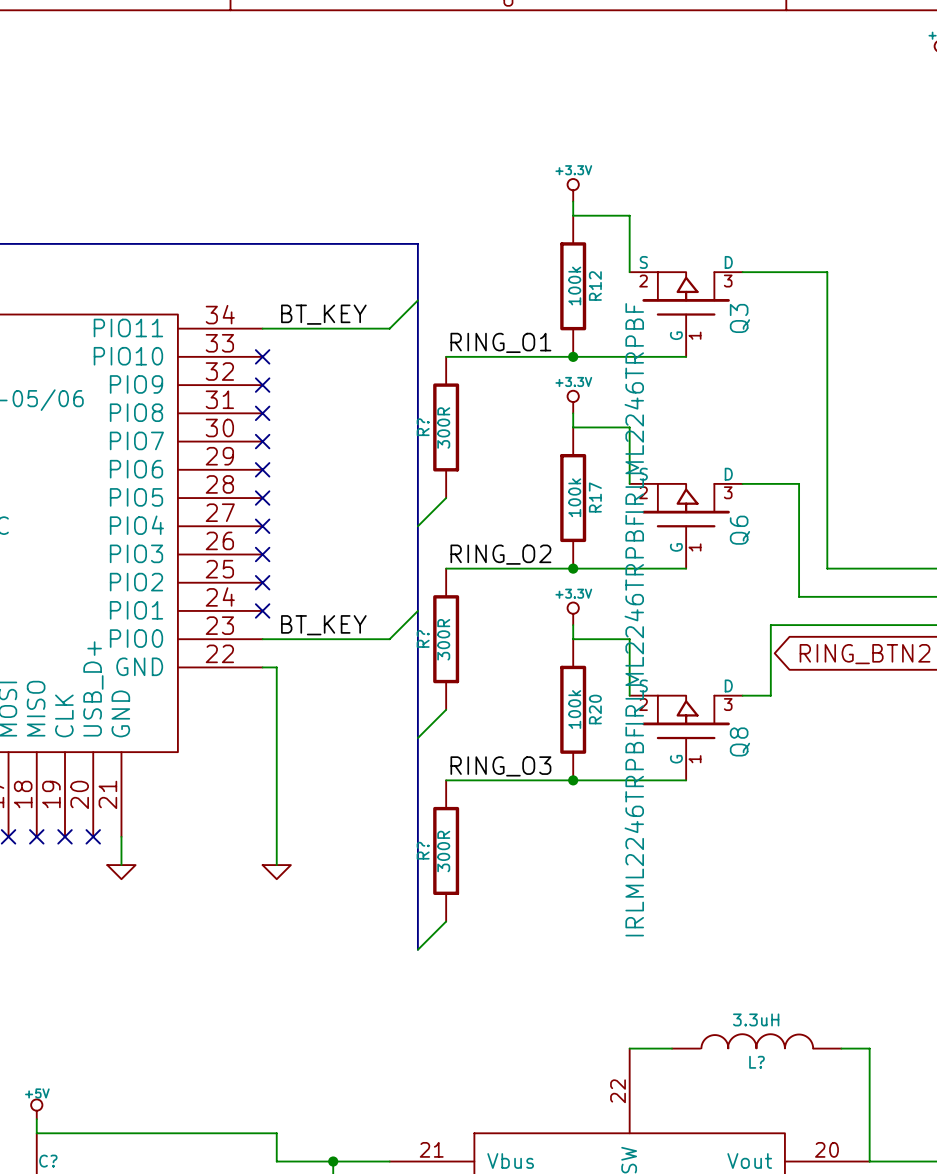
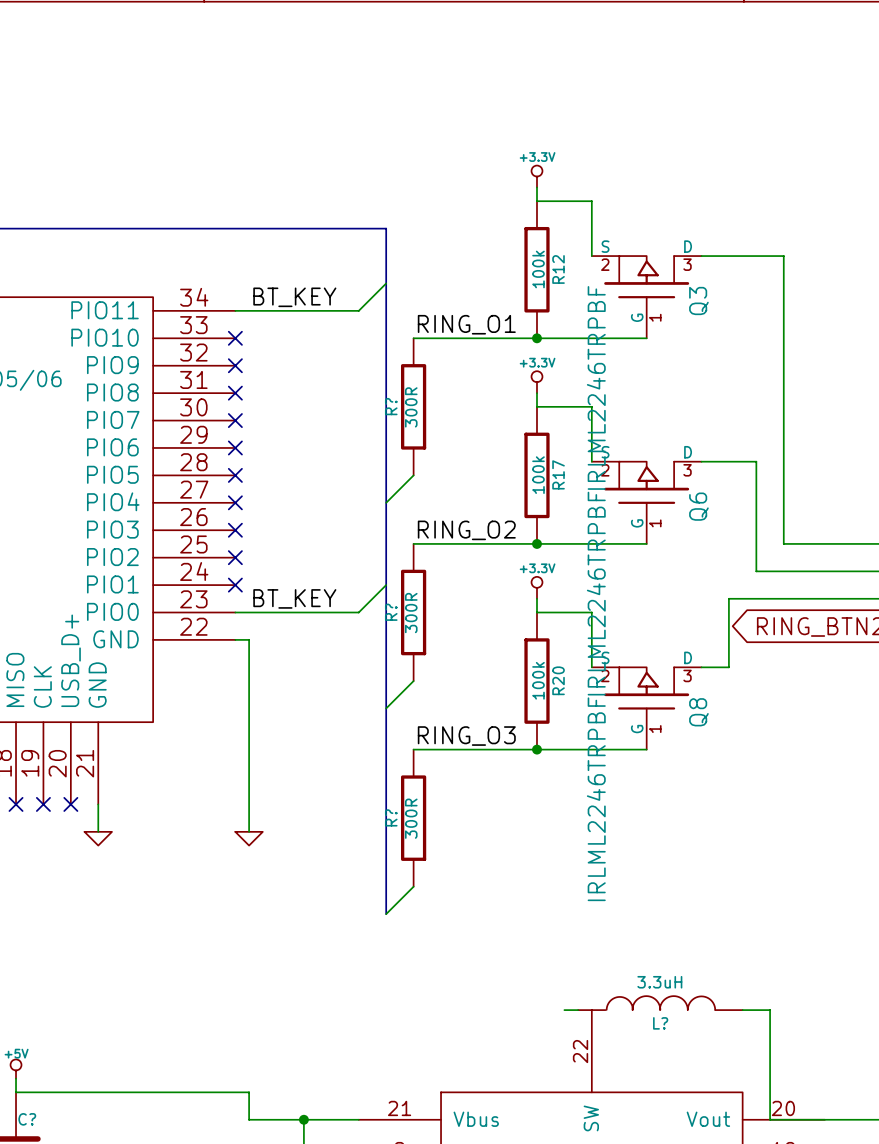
L? position: (756, 1041) -> (660, 1003)
wire: none -> (564, 1010) (578, 1010)
wire: (629, 1048) (672, 1048) -> none
wire: (841, 1048) (869, 1048) (869, 1161) -> (742, 1010) (770, 1010) (770, 1119) (824, 1119)

